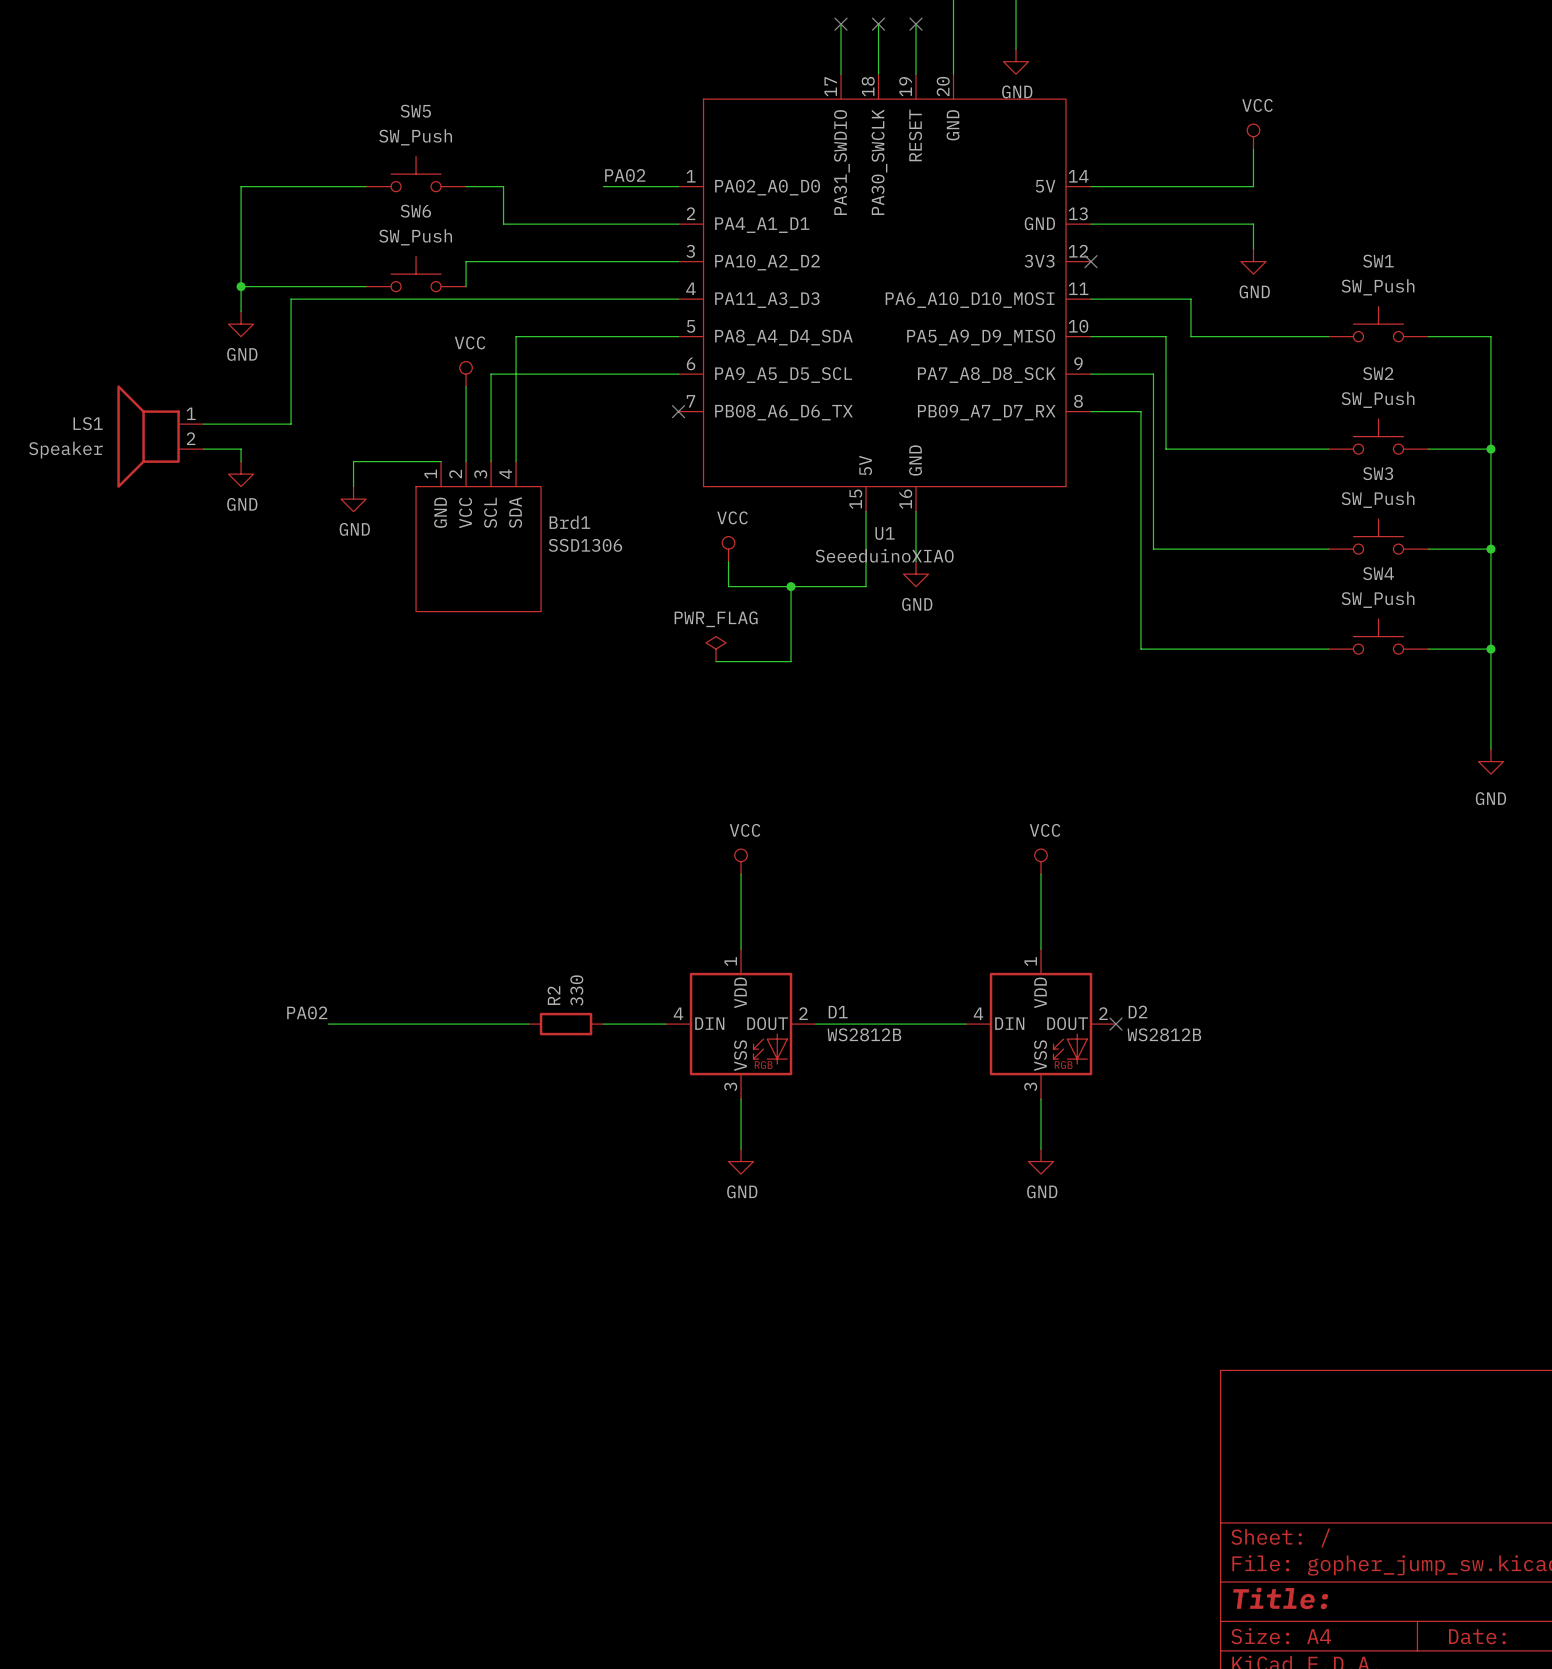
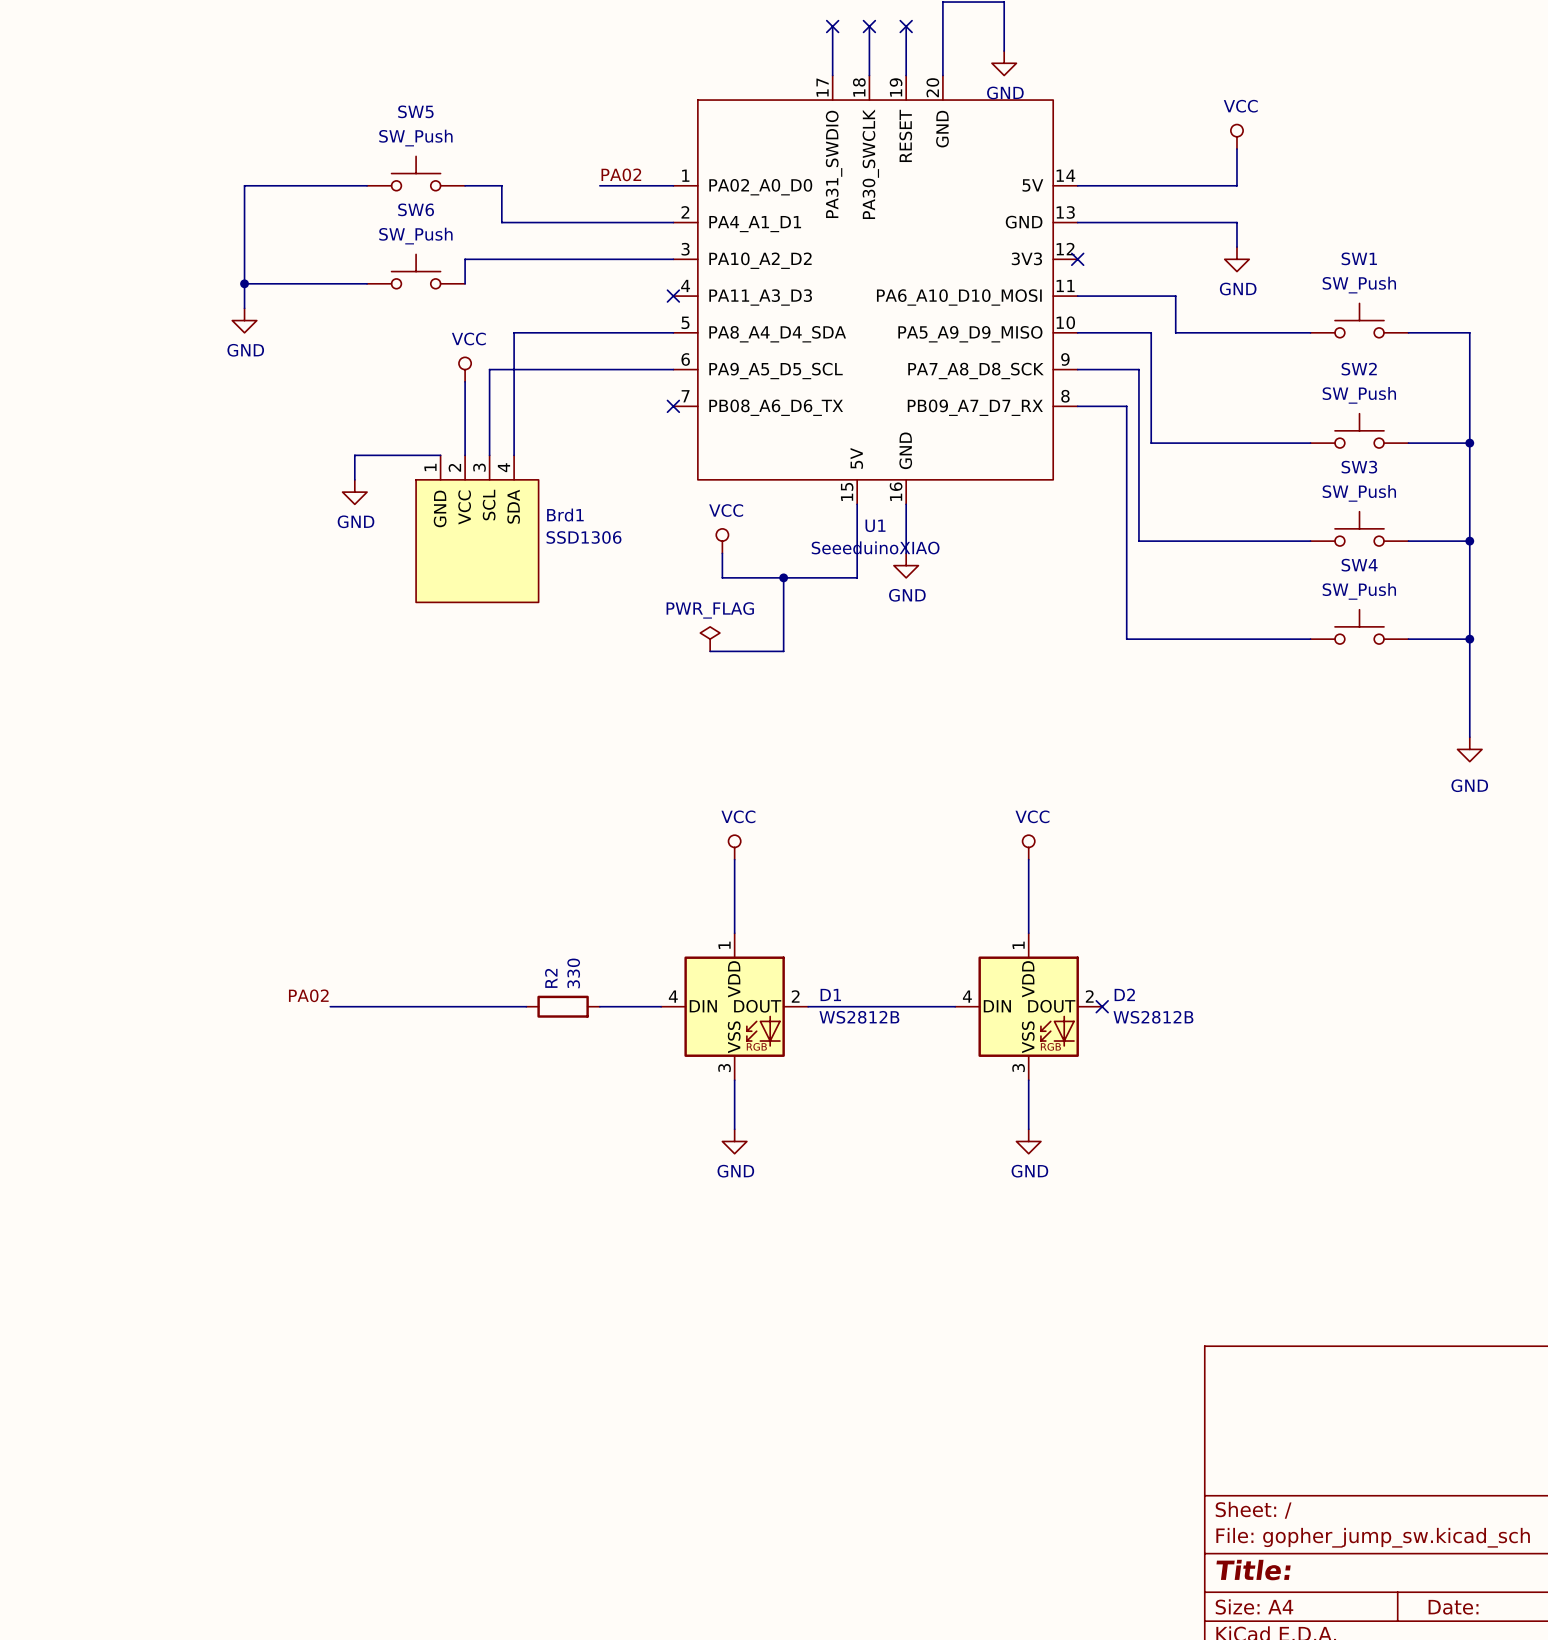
wire: (678, 299) (291, 299) (291, 424) (203, 424) -> none
no-connect mark: none -> (673, 296)
LS1: Speaker (160, 436) -> none
wire: (203, 449) (241, 449) (241, 461) -> none
power symbol: GND (241, 474) -> none

